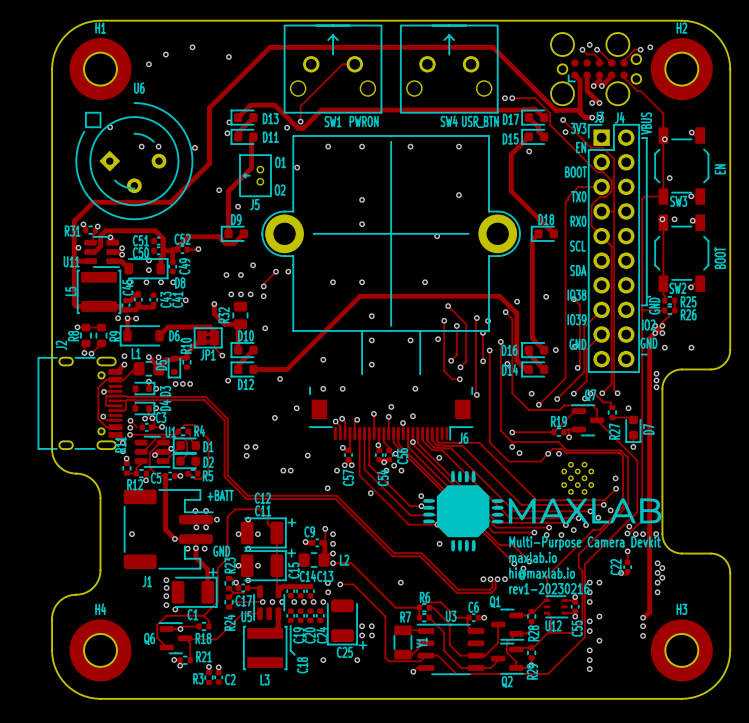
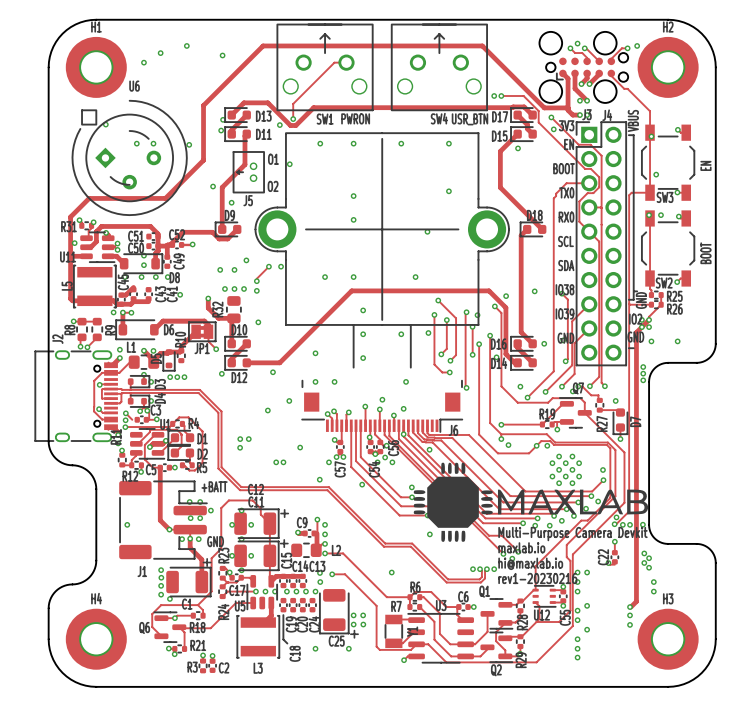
via: (657, 582) -> none
via: (657, 592) -> none
via: none -> (653, 582)
via: none -> (653, 591)

